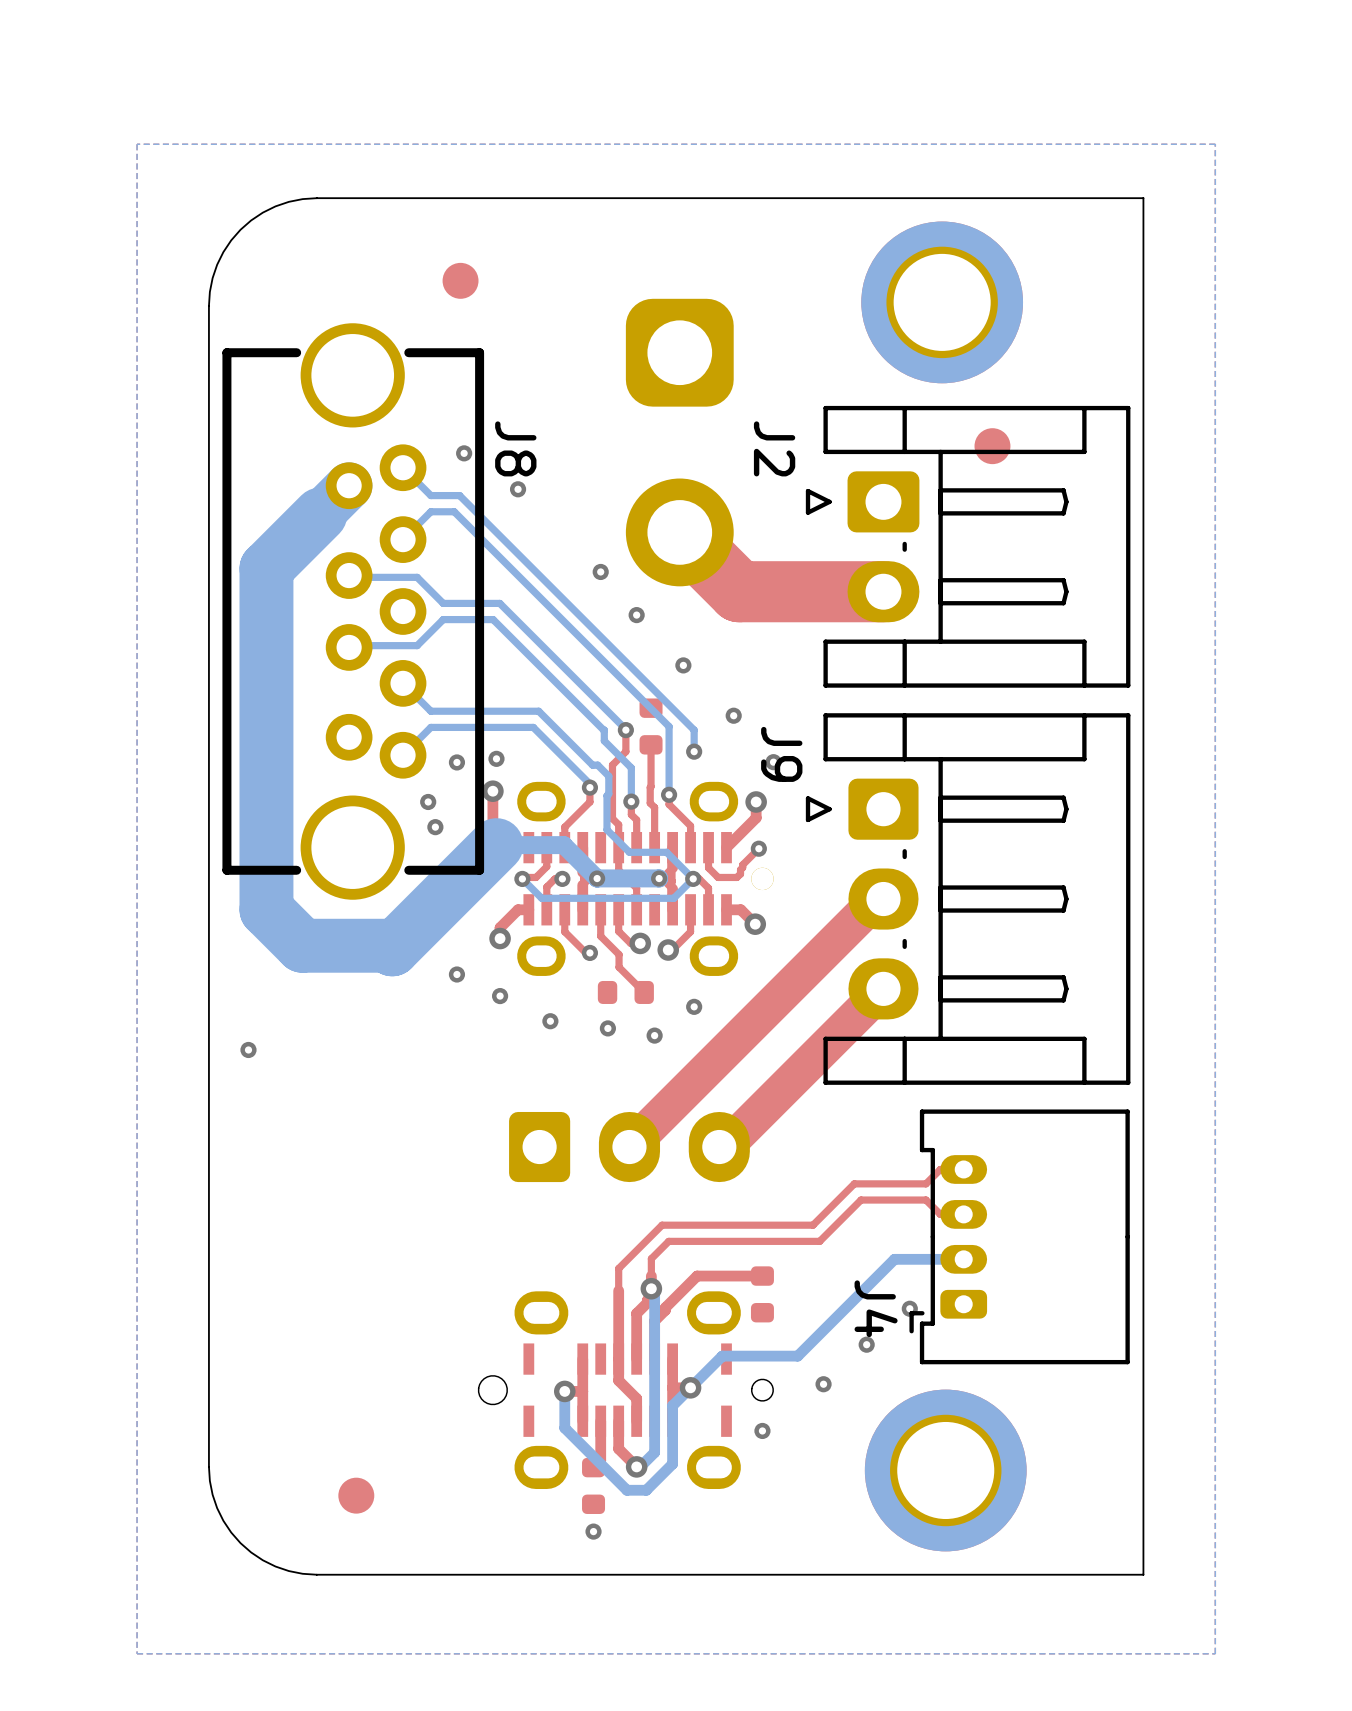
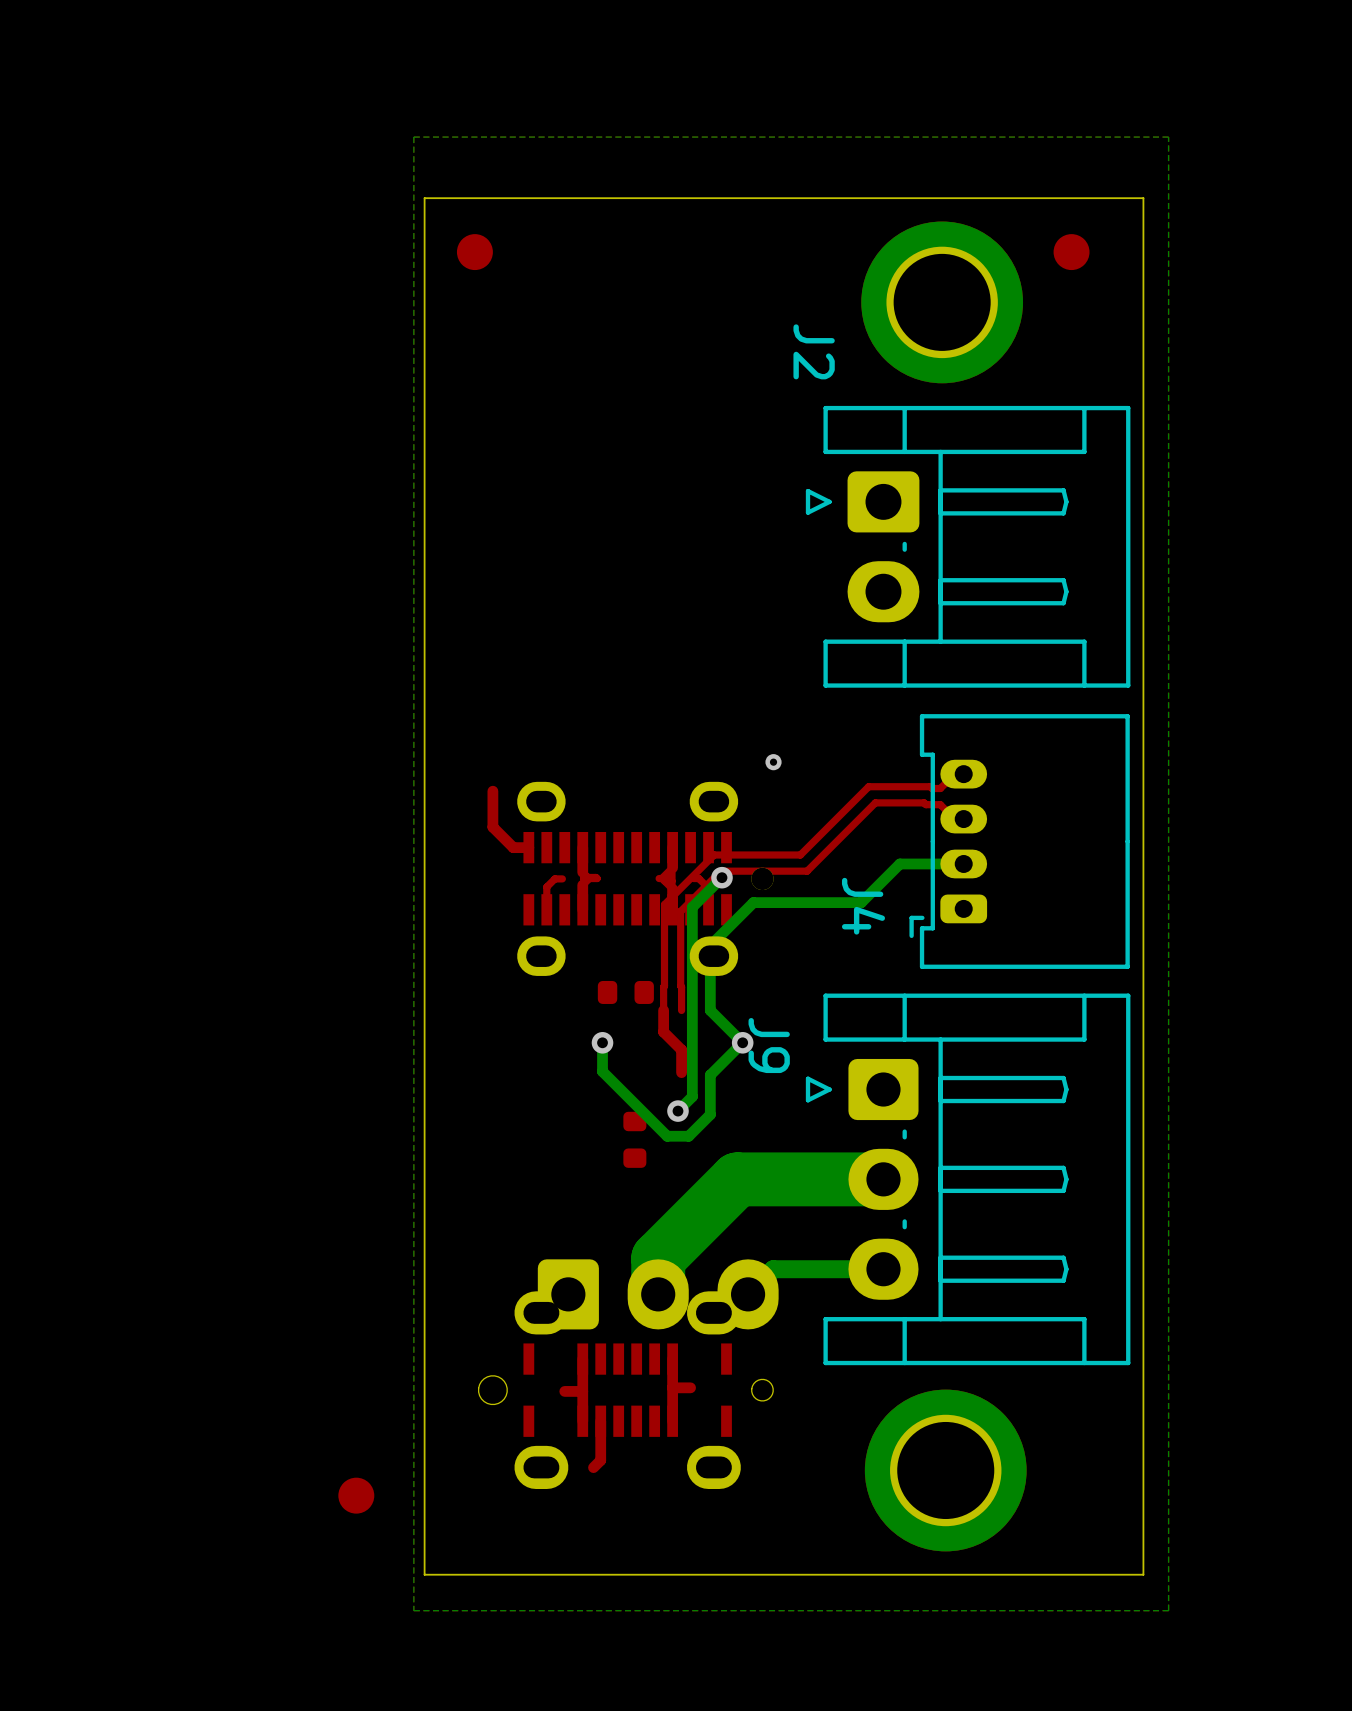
bottom zone outline: (1215, 144) (137, 144) (137, 1653) (1215, 1653) (1215, 144) -> (1168, 137) (1168, 1610) (413, 1610) (413, 137) (1168, 137)
board edge: (424, 198) (302, 199) (275, 206) (262, 212) (240, 229) (223, 252) (212, 278) (208, 305) (209, 1480) (217, 1508) (231, 1532) (251, 1552) (275, 1566) (288, 1571) (316, 1574) (424, 1574) -> (424, 198) (424, 1574)
part position: (460, 280) -> (474, 252)
part: (679, 442) -> none
part position: (992, 446) -> (1071, 252)
J2 name position: J2 (774, 448) -> J2 (814, 351)
via: (464, 453) -> none
bottom track: (403, 467) (430, 495) (459, 495) (694, 730) (694, 751) -> none
bottom track: (349, 485) (266, 568) (266, 909) (302, 945) (388, 945) (392, 949) (496, 845) (563, 845) (597, 878) -> none
via: (518, 489) -> none
top track: (679, 532) (739, 591) (883, 591) -> none
bottom track: (403, 539) (430, 511) (454, 511) (669, 726) (669, 794) -> none
via: (600, 571) -> none
bottom track: (349, 575) (350, 577) (417, 577) (443, 603) (499, 603) (625, 729) -> none
J8: (353, 611) -> none
via: (636, 615) -> none
bottom track: (349, 647) (350, 645) (417, 645) (443, 619) (493, 619) (603, 730) -> none
via: (683, 665) -> none
bottom track: (403, 683) (430, 711) (538, 711) (592, 765) (597, 765) (608, 776) (607, 829) (629, 852) (666, 852) (693, 878) (673, 898) (541, 898) (522, 878) -> none
via: (733, 715) -> none
part: (651, 726) -> none
bottom track: (604, 730) (604, 740) (631, 767) (631, 801) -> none
top track: (625, 730) (625, 751) (612, 765) (612, 818) (618, 824) (618, 870) (636, 888) (636, 909) -> none
via: (625, 730) -> none
top track: (651, 744) (650, 803) (654, 807) (654, 847) -> none
via: (694, 751) -> none
J9 name position: J9 (781, 754) -> J9 (769, 1045)
bottom track: (403, 755) (430, 727) (533, 727) (589, 784) (589, 787) -> none
via: (496, 758) -> none
via: (456, 762) -> none
top track: none -> (963, 774) (954, 774) (940, 788) (930, 786) (868, 786) (800, 855) (714, 855) (664, 904) (663, 1032) (681, 1049) (681, 1072)
top track: (589, 787) (589, 801) (564, 827) (564, 847) -> none
via: (589, 787) -> none
via: (492, 791) -> none
top track: (669, 794) (669, 804) (690, 825) (690, 847) -> none
via: (669, 794) -> none
via: (428, 801) -> none
top track: (631, 801) (631, 814) (636, 819) (636, 847) -> none
via: (631, 801) -> none
top track: (756, 801) (756, 817) (726, 847) -> none
via: (756, 801) -> none
top track: none -> (963, 819) (954, 819) (940, 804) (875, 802) (807, 871) (720, 871) (680, 911) (681, 1010)
via: (435, 827) -> none
top track: (546, 847) (546, 866) (536, 877) (522, 878) -> none
top track: (708, 847) (708, 867) (718, 877) (736, 877) (740, 874) (742, 864) (758, 848) -> none
via: (758, 848) -> none
bottom track: none -> (963, 863) (899, 863) (861, 902) (753, 902) (710, 945) (710, 1010) (742, 1042) (710, 1075) (710, 1114) (688, 1136) (667, 1136) (602, 1071) (602, 1042)
bottom track: none -> (721, 877) (692, 907) (692, 1096) (677, 1111)
via: none -> (721, 877)
via: (522, 878) -> none
via: (562, 878) -> none
via: (597, 878) -> none
bottom track: (659, 878) (597, 878) -> none
via: (659, 878) -> none
via: (693, 878) -> none
top track: (883, 899) (877, 899) (629, 1147) -> none
J9 position: (968, 899) -> (968, 1179)
top track: (528, 909) (518, 909) (500, 927) (500, 938) -> none
top track: (564, 909) (564, 931) (585, 952) (589, 952) -> none
top track: (600, 909) (600, 936) (619, 954) (619, 967) (644, 992) -> none
top track: (618, 909) (618, 931) (630, 943) (640, 943) -> none
top track: (690, 909) (690, 931) (672, 950) (668, 950) -> none
top track: (726, 909) (740, 909) (755, 924) -> none
via: (755, 924) -> none
via: (500, 938) -> none
via: (640, 943) -> none
via: (668, 950) -> none
via: (589, 952) -> none
via: (456, 974) -> none
top track: (883, 988) (725, 1147) (719, 1147) -> none
via: (500, 996) -> none
via: (694, 1006) -> none
via: (550, 1021) -> none
via position: (607, 1028) -> (602, 1042)
via: (654, 1035) -> none
via: none -> (742, 1042)
via: (248, 1049) -> none
part footprint: [509, 1111, 750, 1183] -> [623, 1111, 647, 1168]
via: none -> (677, 1111)
top track: (963, 1169) (940, 1169) (925, 1183) (854, 1183) (813, 1225) (662, 1225) (618, 1268) (618, 1380) (636, 1398) (636, 1421) -> none
bottom track: none -> (883, 1179) (737, 1179) (658, 1258) (658, 1294)
top track: (963, 1214) (940, 1214) (925, 1200) (861, 1200) (819, 1241) (668, 1241) (651, 1258) (651, 1296) (636, 1313) (636, 1359) -> none
J4 position: (1019, 1236) -> (1019, 841)
bottom track: (963, 1259) (894, 1259) (797, 1356) (722, 1356) (672, 1405) (672, 1463) (646, 1490) (626, 1490) (564, 1428) (564, 1391) -> none
bottom track: none -> (883, 1269) (773, 1269) (748, 1294)
top track: (762, 1276) (697, 1276) (654, 1320) (654, 1359) -> none
bottom track: (651, 1288) (654, 1291) (654, 1452) (640, 1466) (636, 1466) -> none
via: (651, 1288) -> none
part: none -> (658, 1294)
part: (762, 1294) -> none
J4 name position: J4 (876, 1308) -> J4 (863, 906)
via: (909, 1308) -> none
via: (866, 1344) -> none
via: (823, 1384) -> none
via: (690, 1387) -> none
via: (564, 1391) -> none
top track: (618, 1421) (618, 1448) (636, 1466) -> none
via: (762, 1430) -> none
via: (636, 1466) -> none
part: (593, 1485) -> none
via: (593, 1531) -> none

